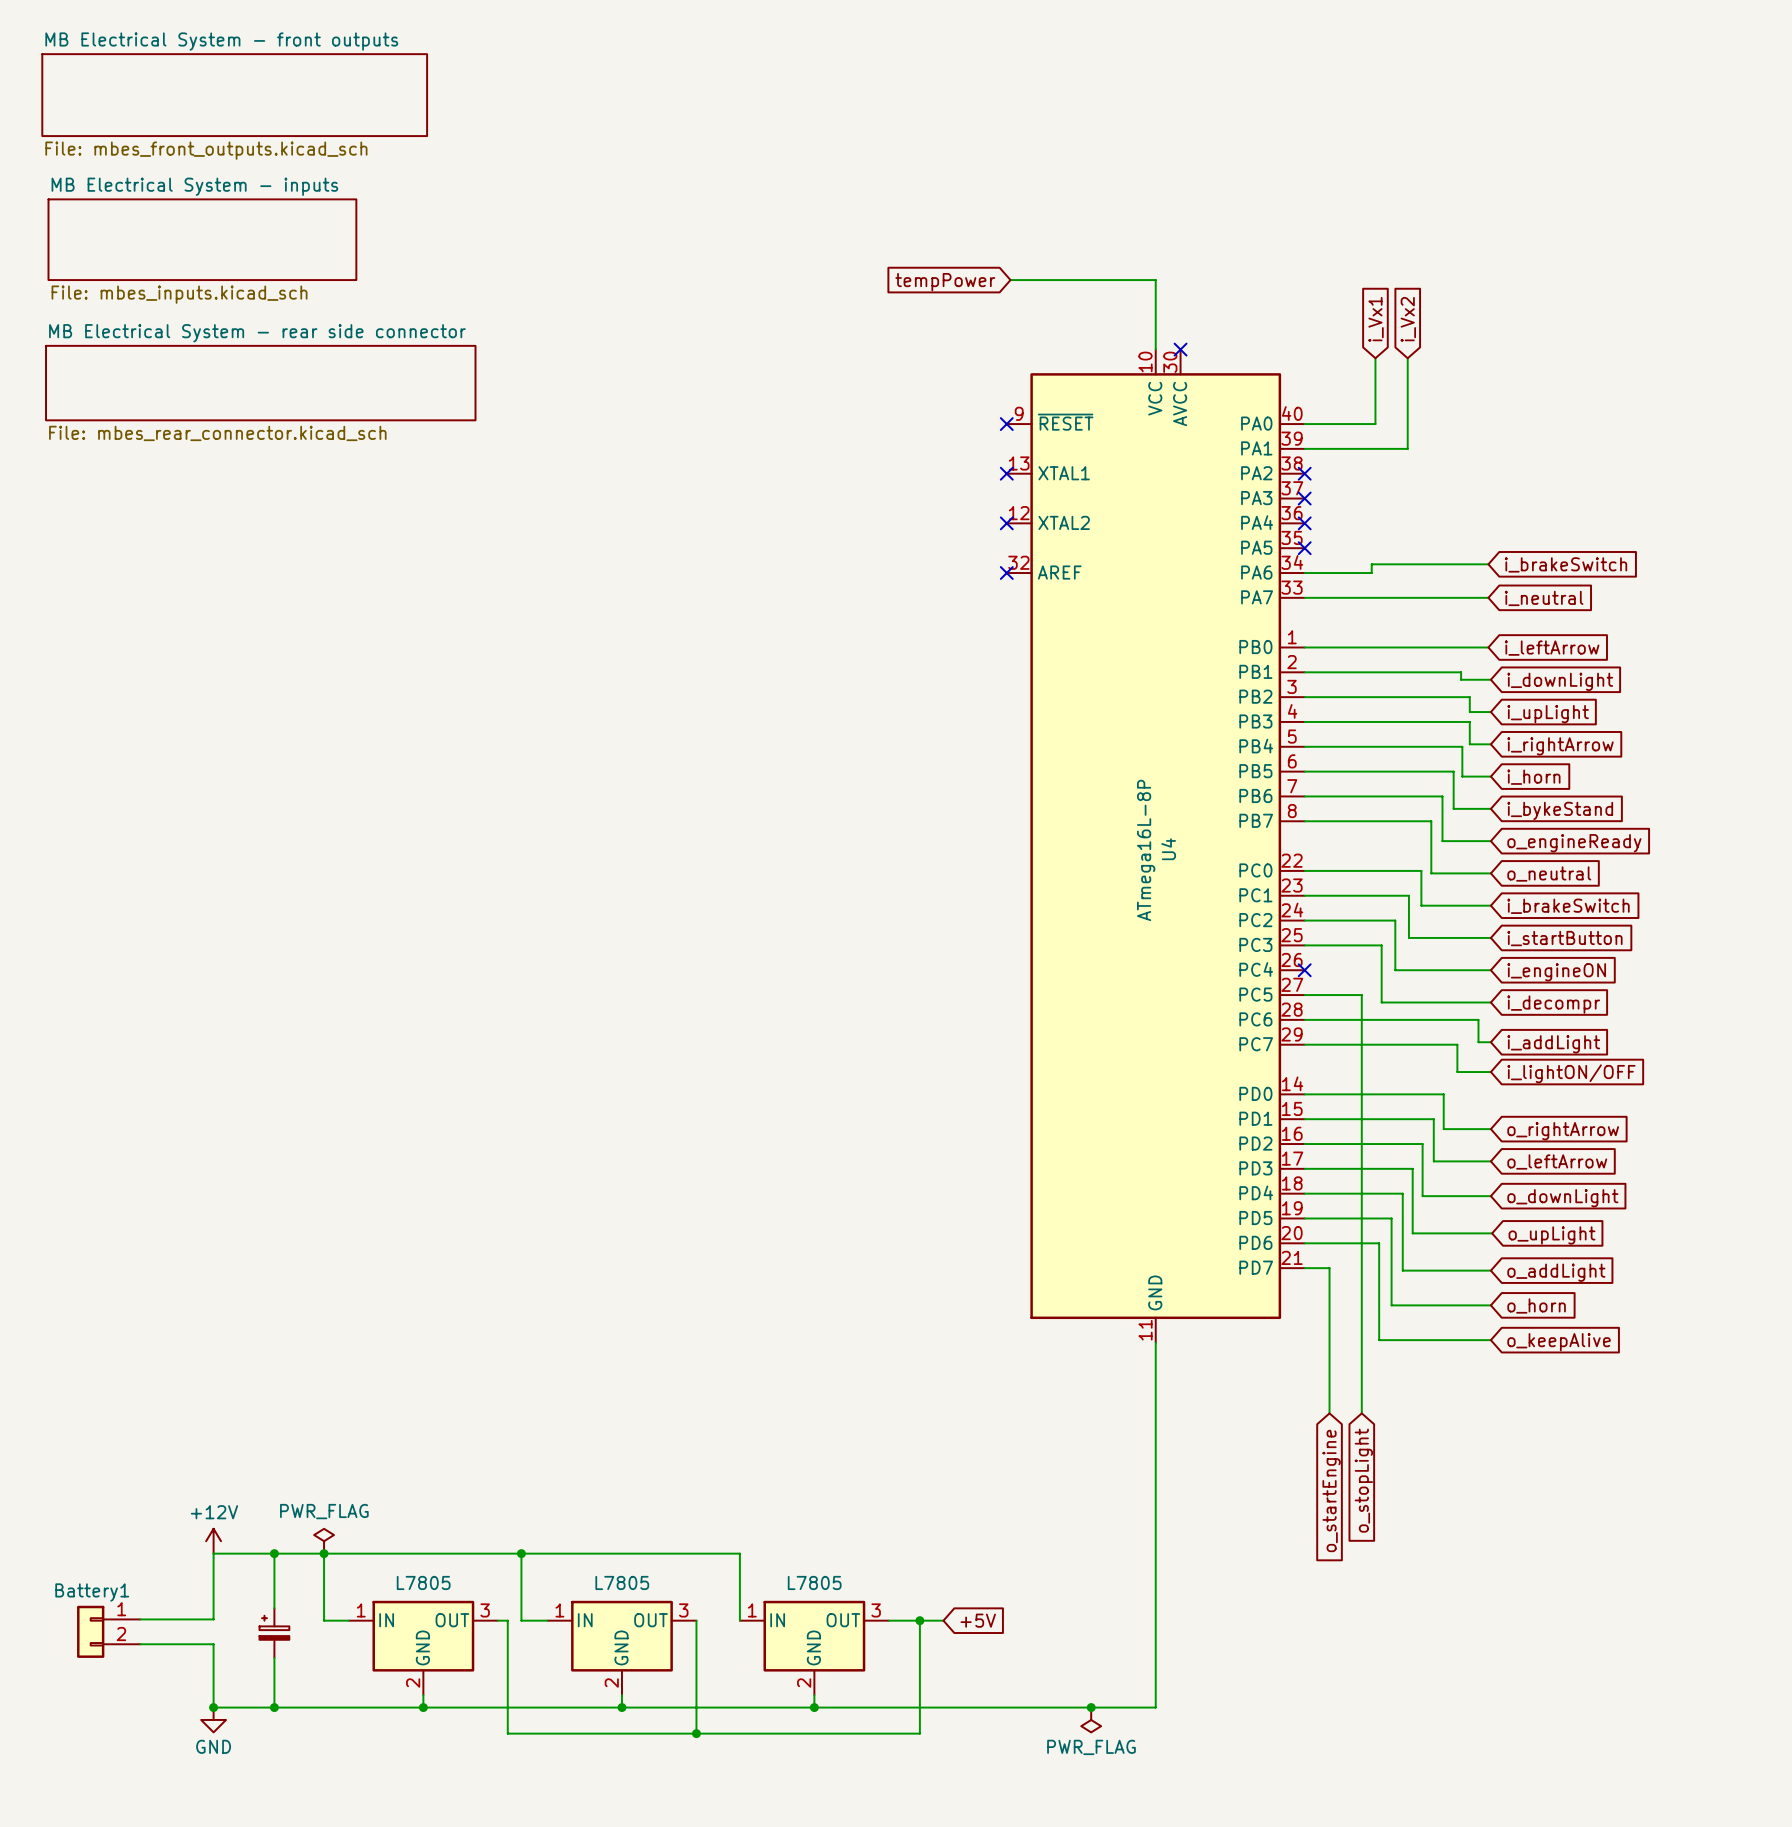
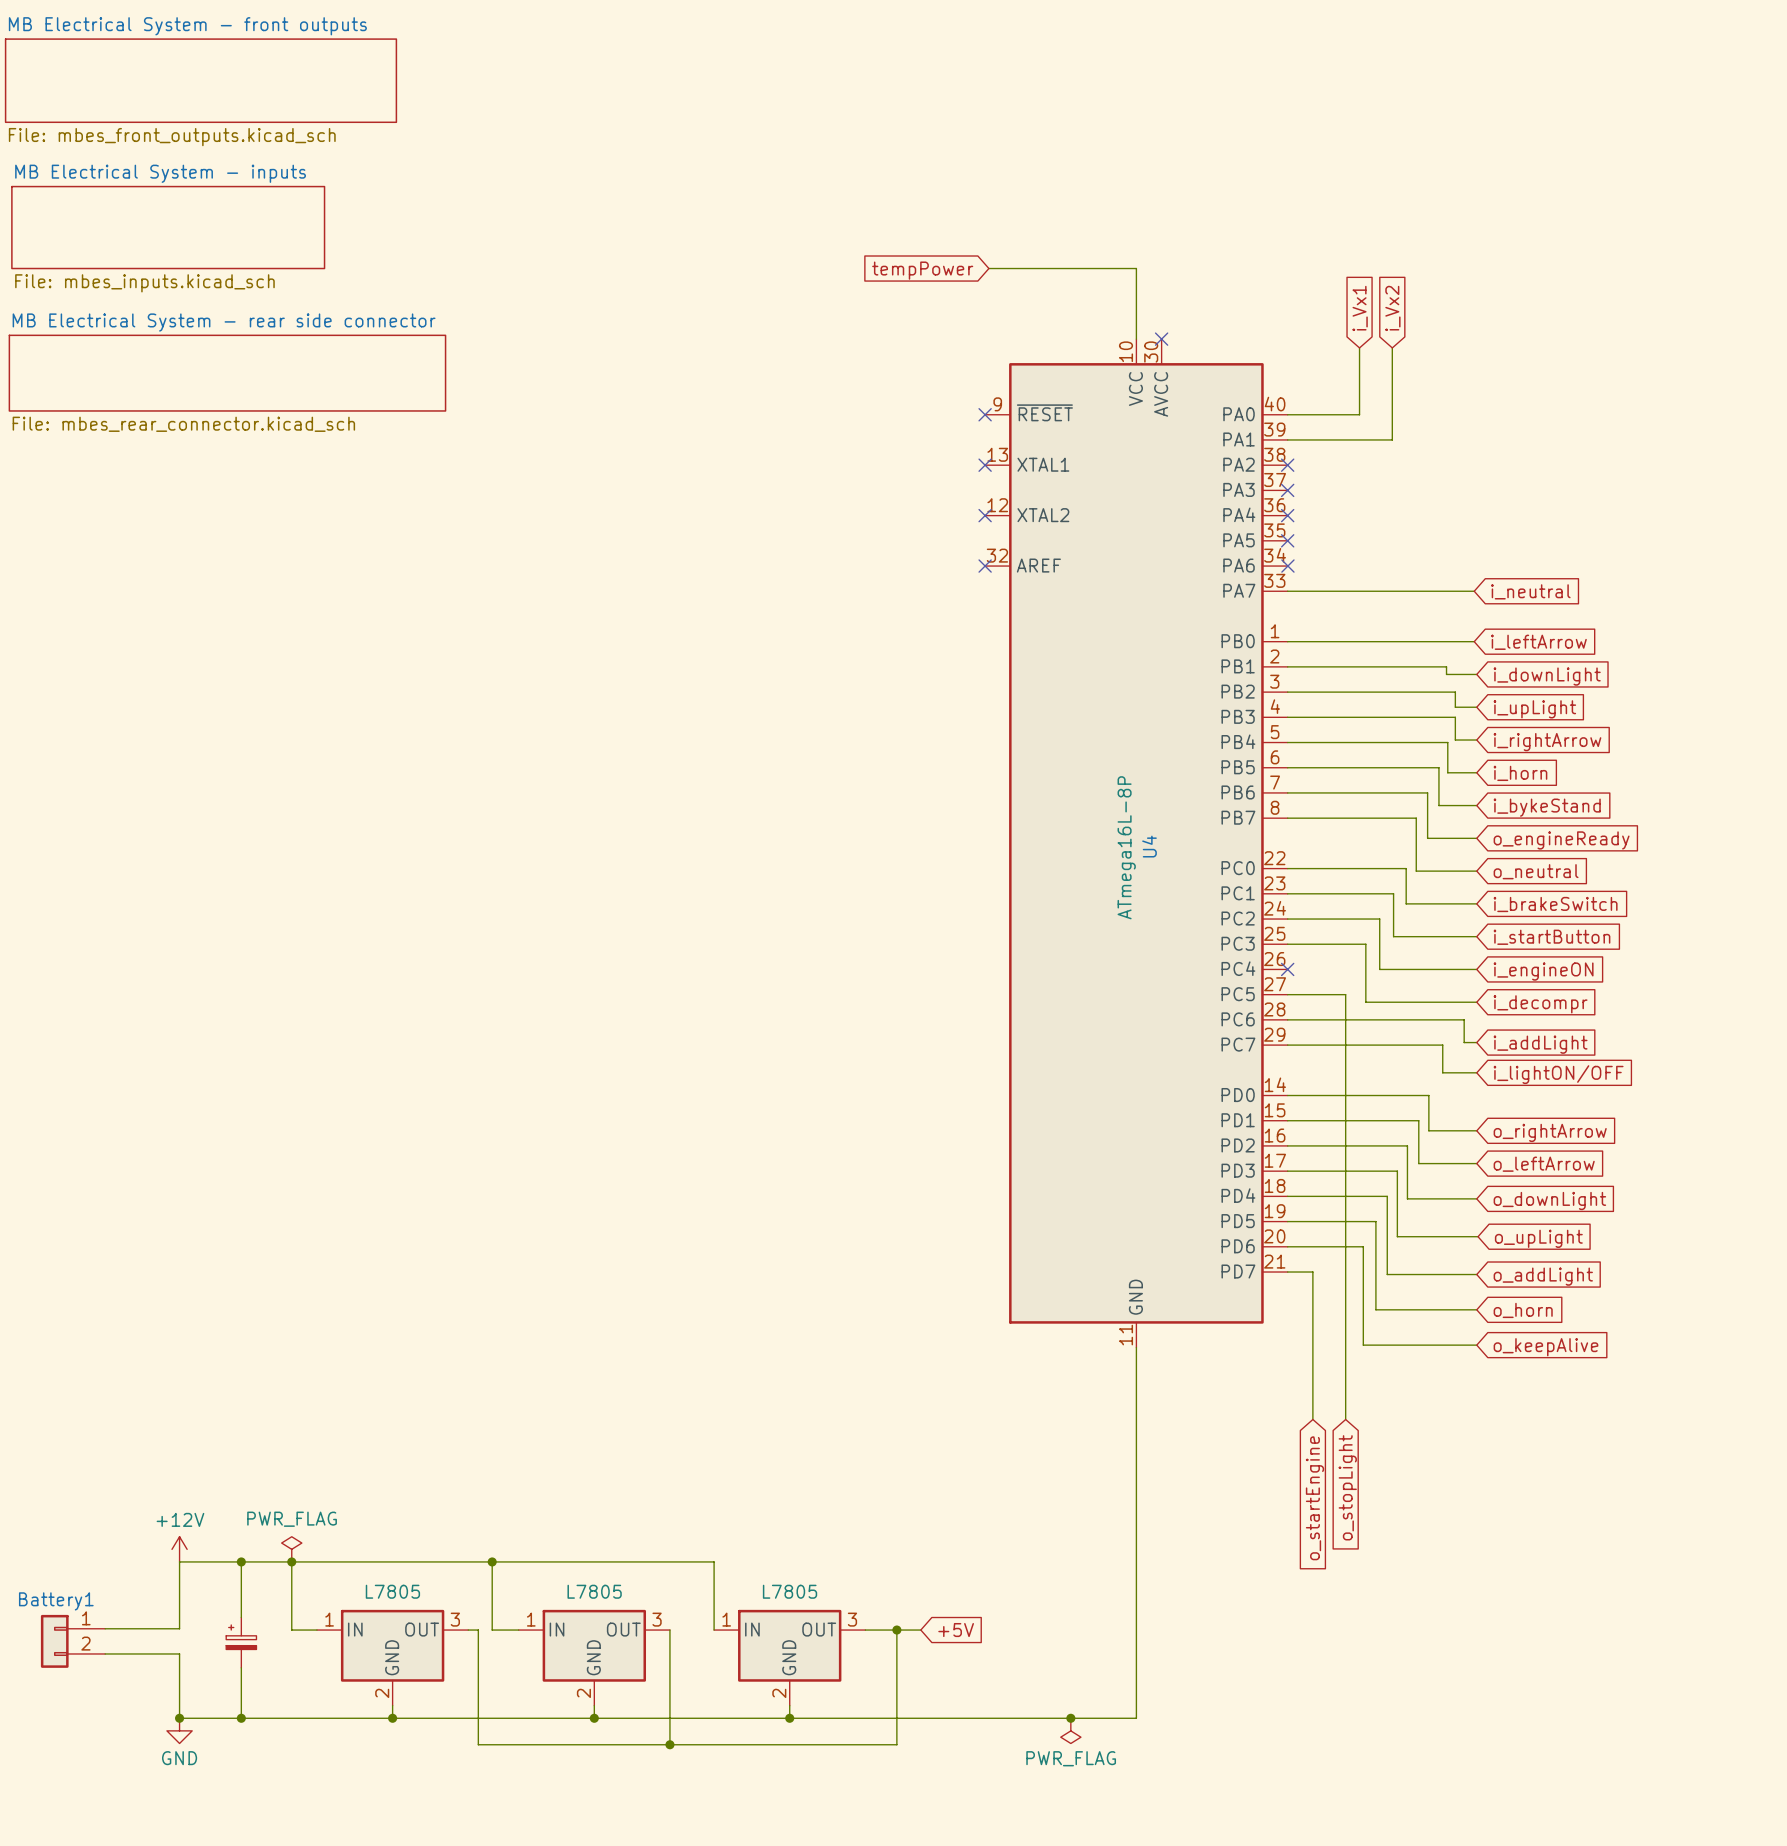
wire: (1488, 564) (1371, 564) (1371, 573) (1304, 573) -> none
global label: i_brakeSwitch (1566, 564) -> none
no-connect mark: none -> (1287, 566)

